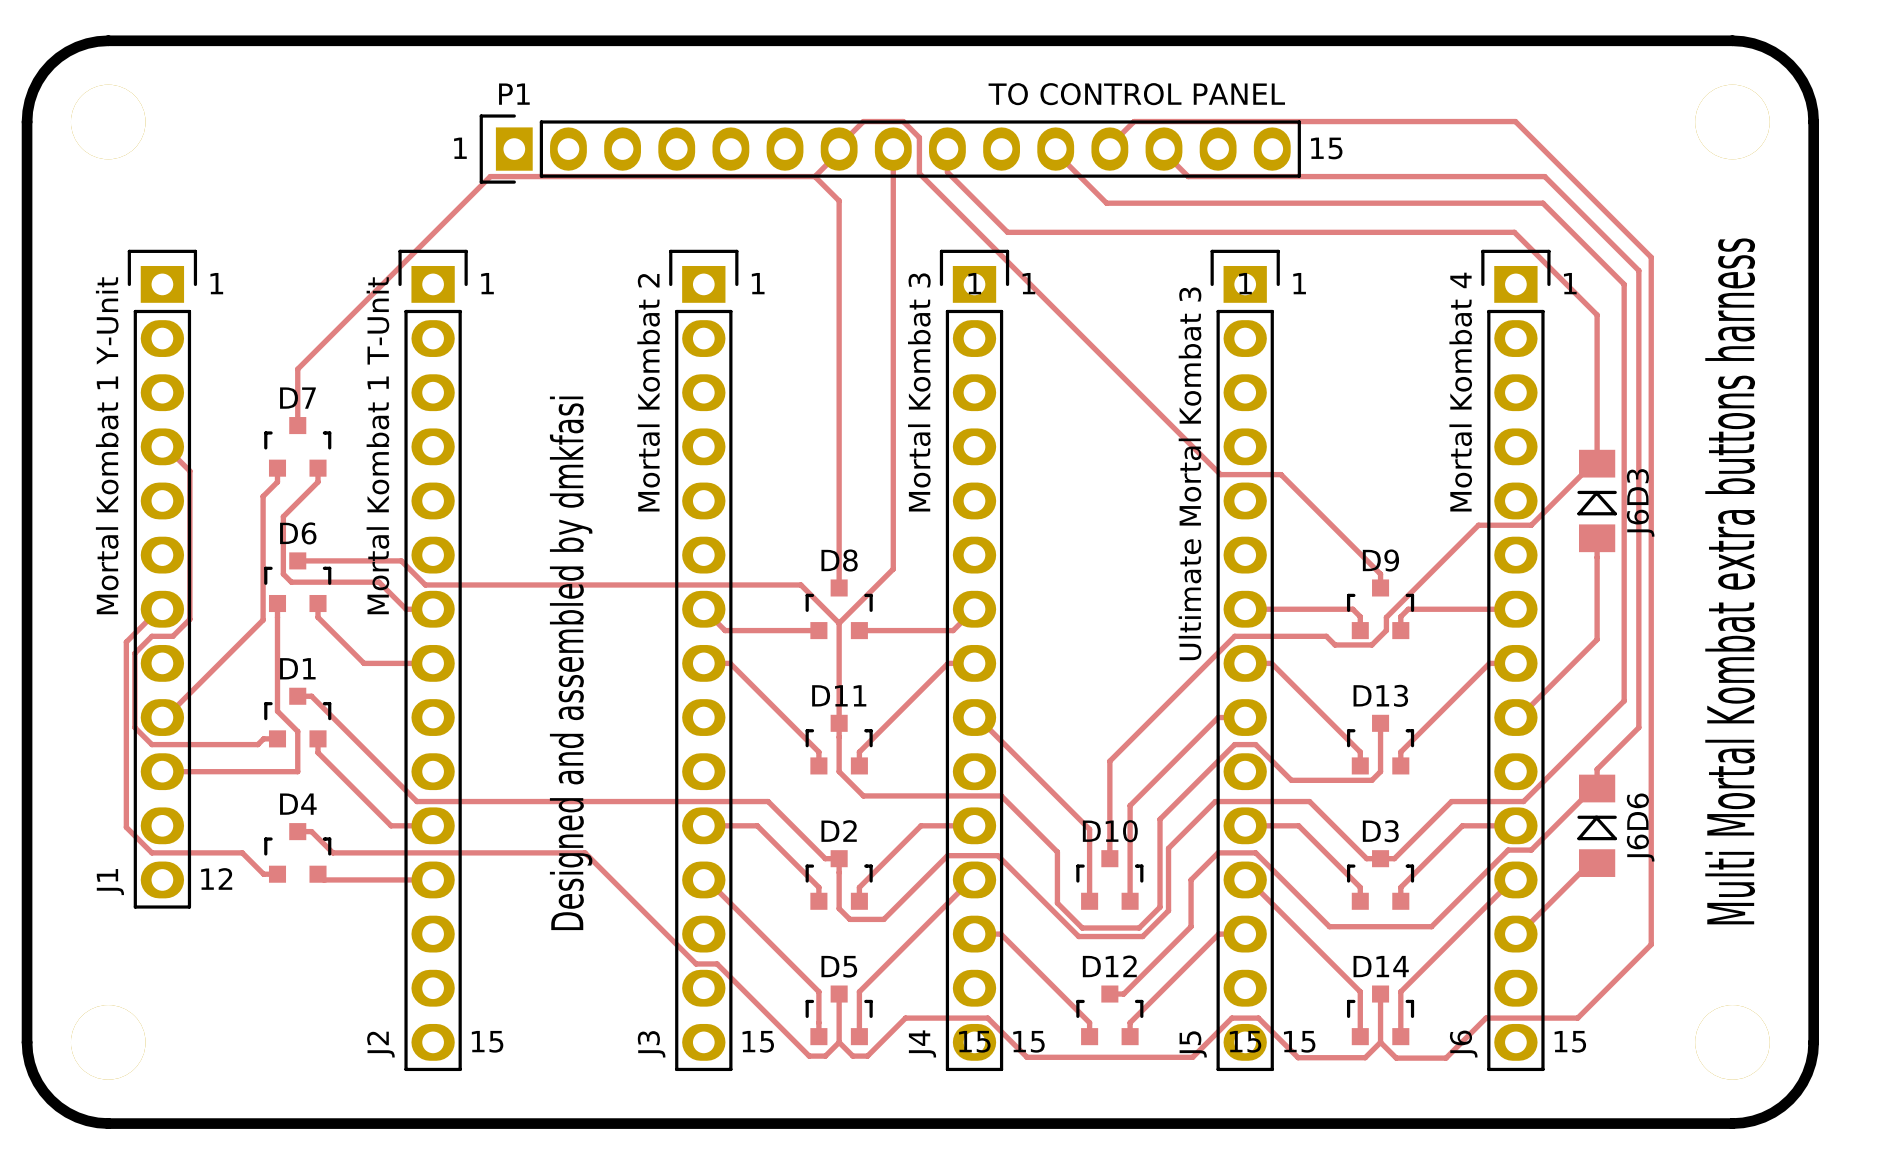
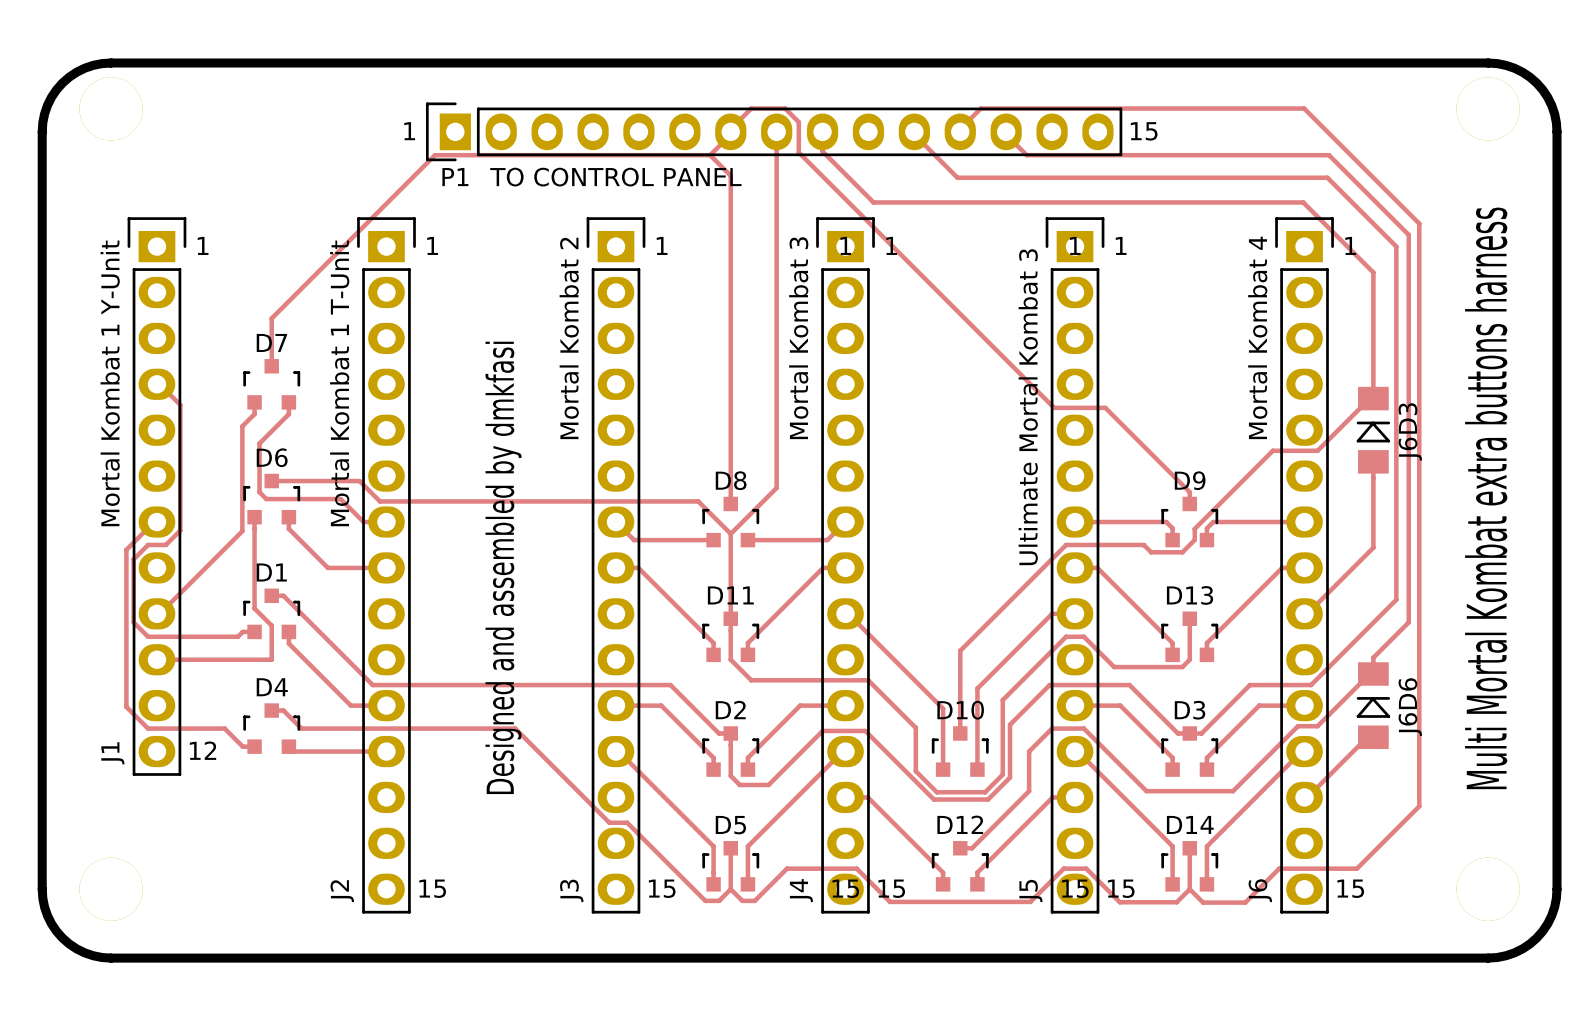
P1 name position: P1 (514, 94) -> P1 (455, 177)
P1 value position: TO CONTROL PANEL (1136, 94) -> TO CONTROL PANEL (615, 177)
board edge: (27, 149) (27, 121) (29, 100) (43, 72) (58, 57) (77, 46) (108, 40) (1732, 40) (1763, 46) (1781, 57) (1796, 72) (1810, 100) (1813, 121) (1813, 149) -> (42, 131) (47, 105) (62, 83) (84, 68) (111, 63) (1488, 63) (1514, 68) (1536, 83) (1551, 105) (1557, 131)

